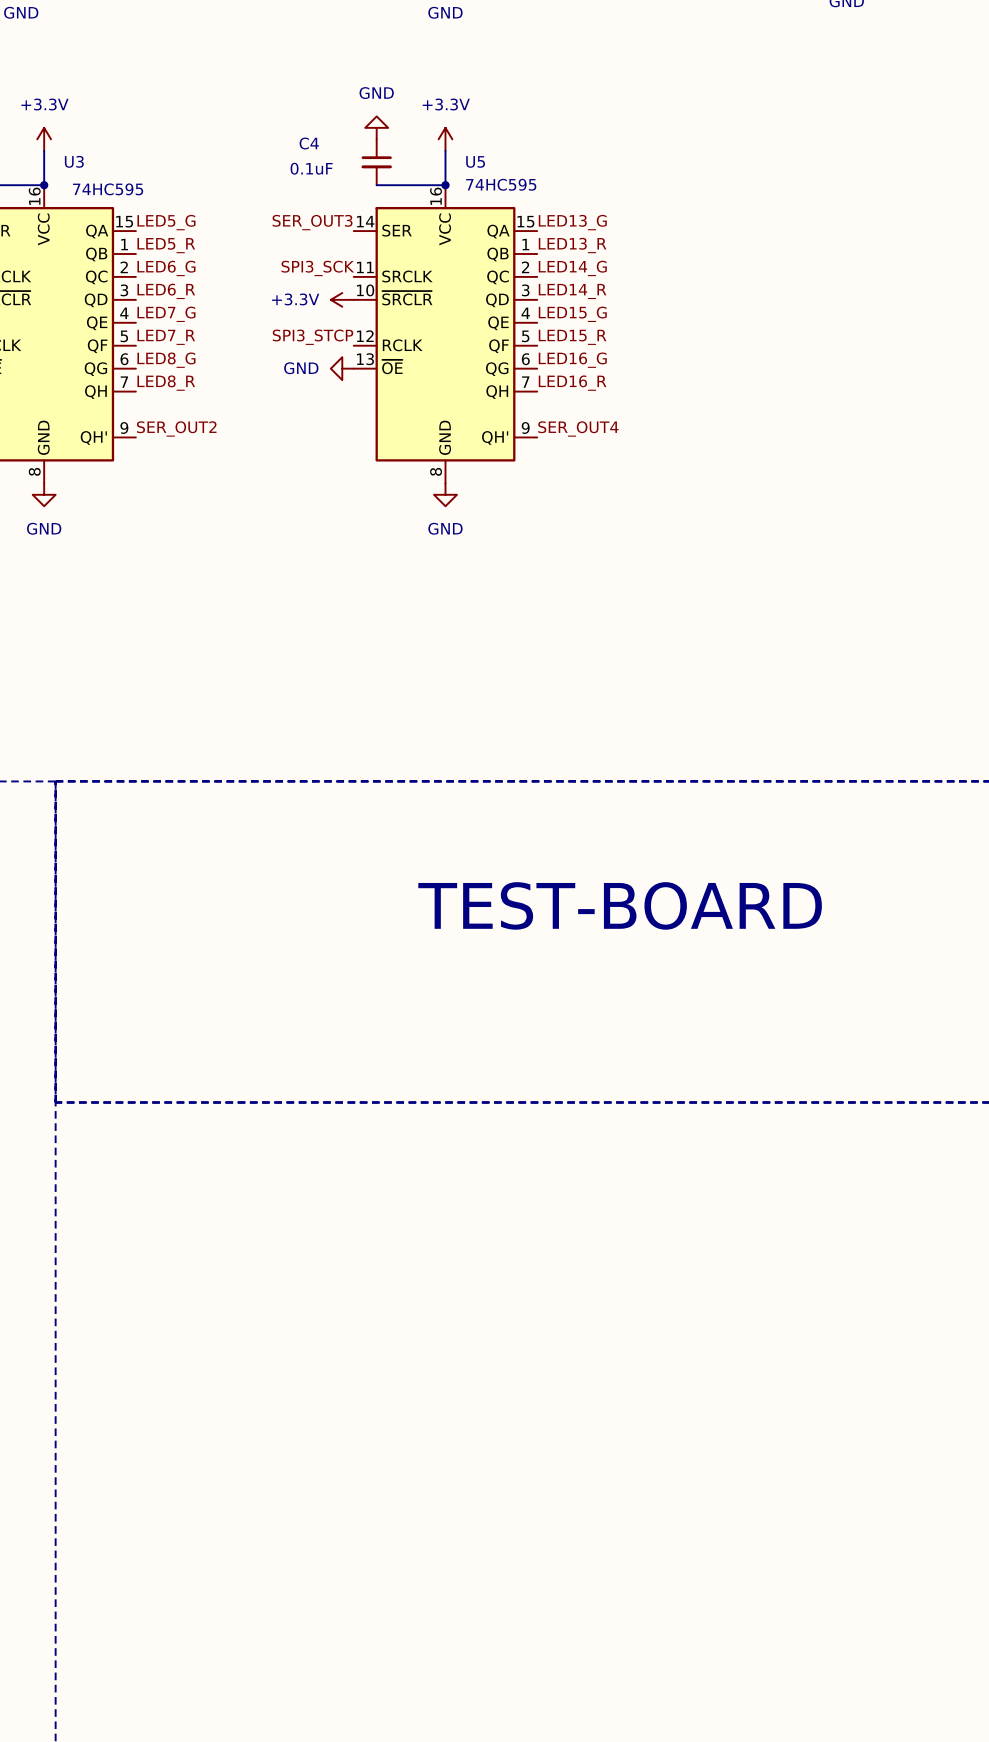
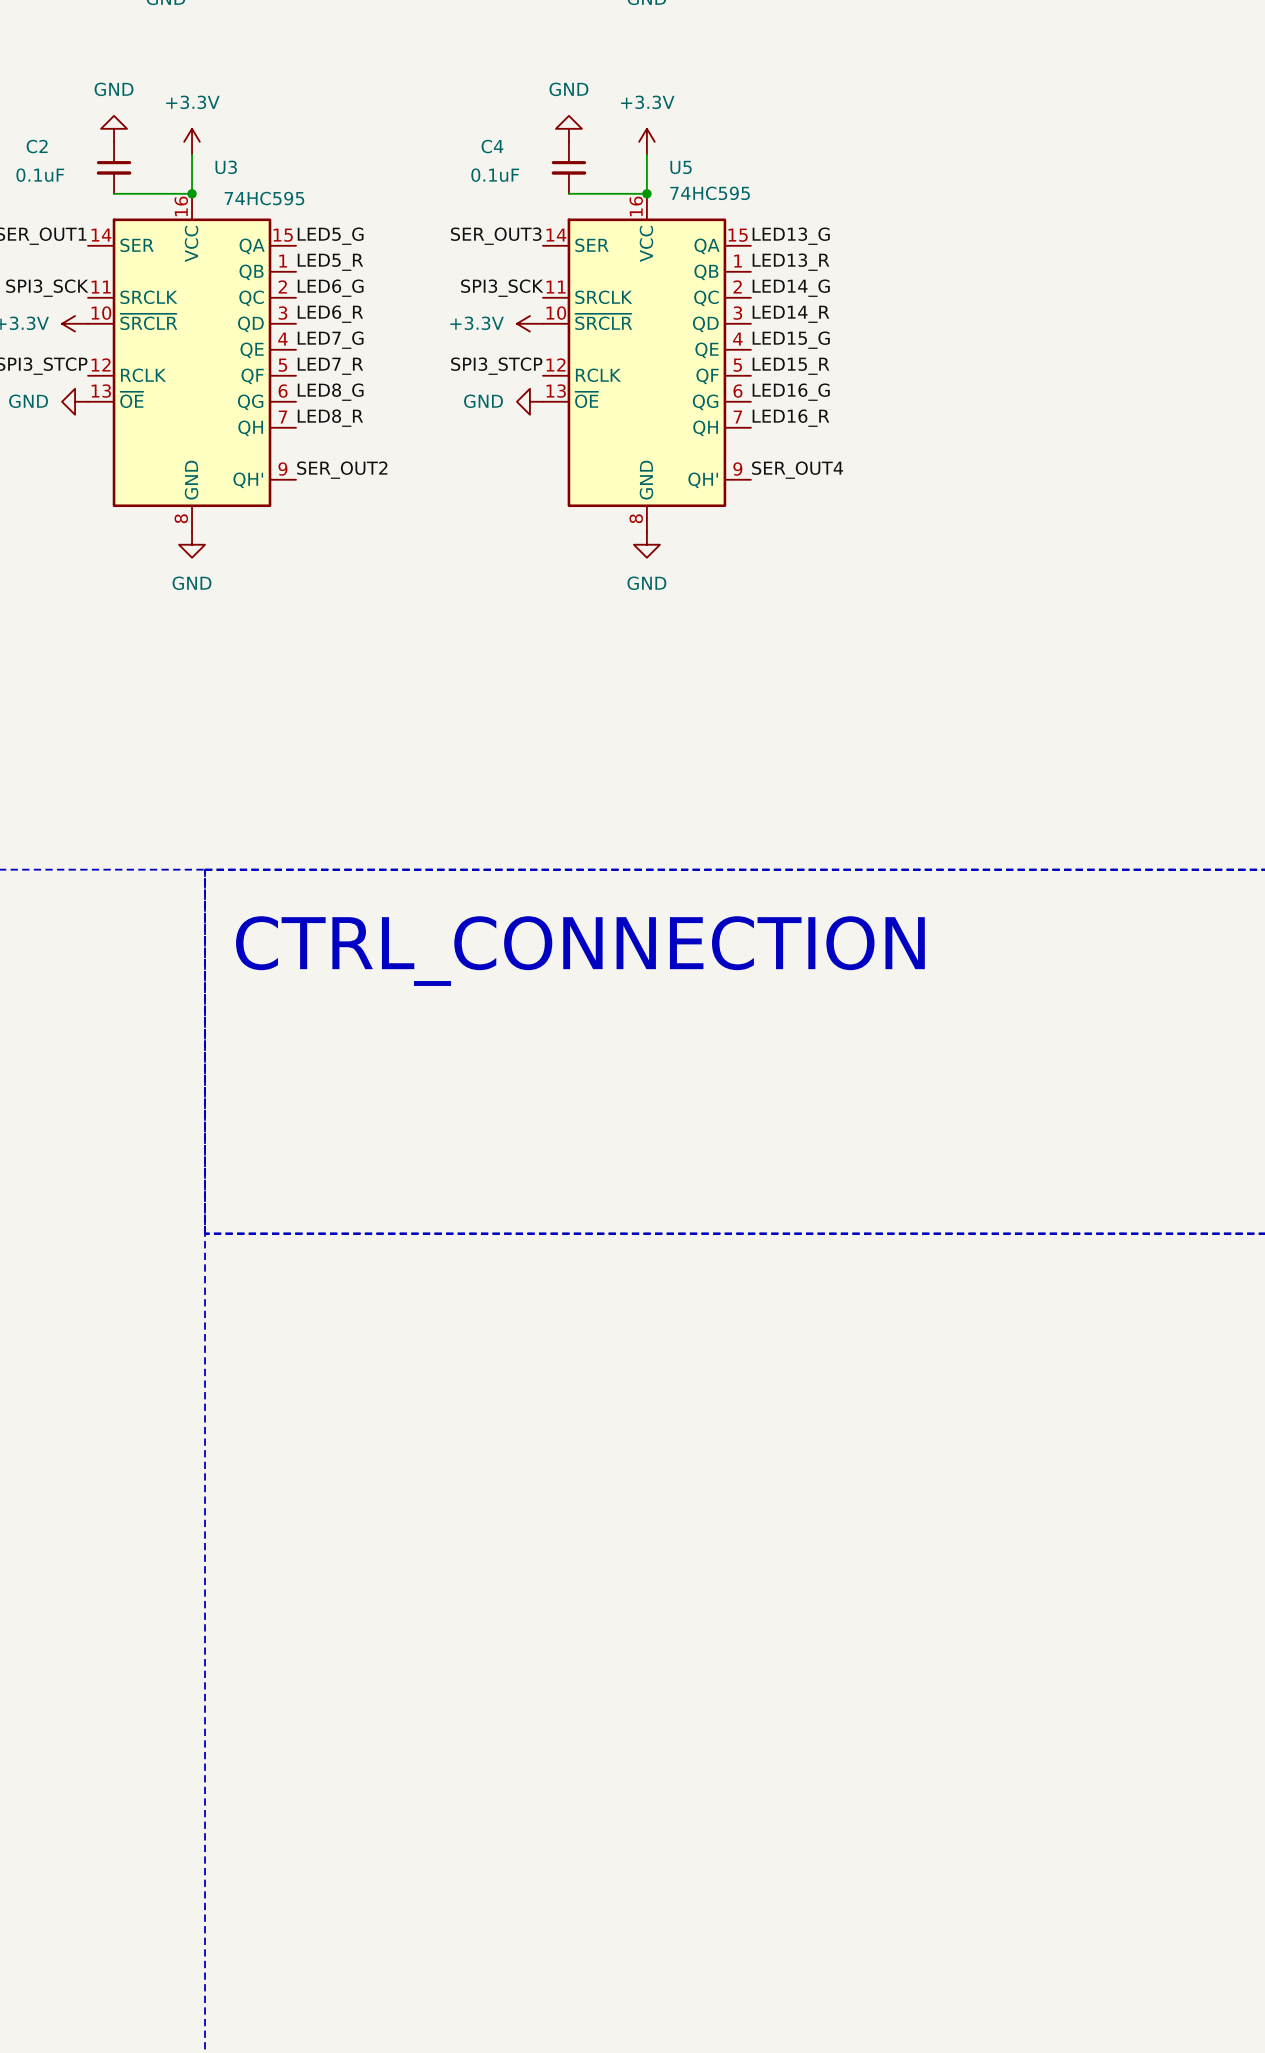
text: none -> CTRL_CONNECTION (580, 951)
text: TEST-BOARD (620, 905) -> none

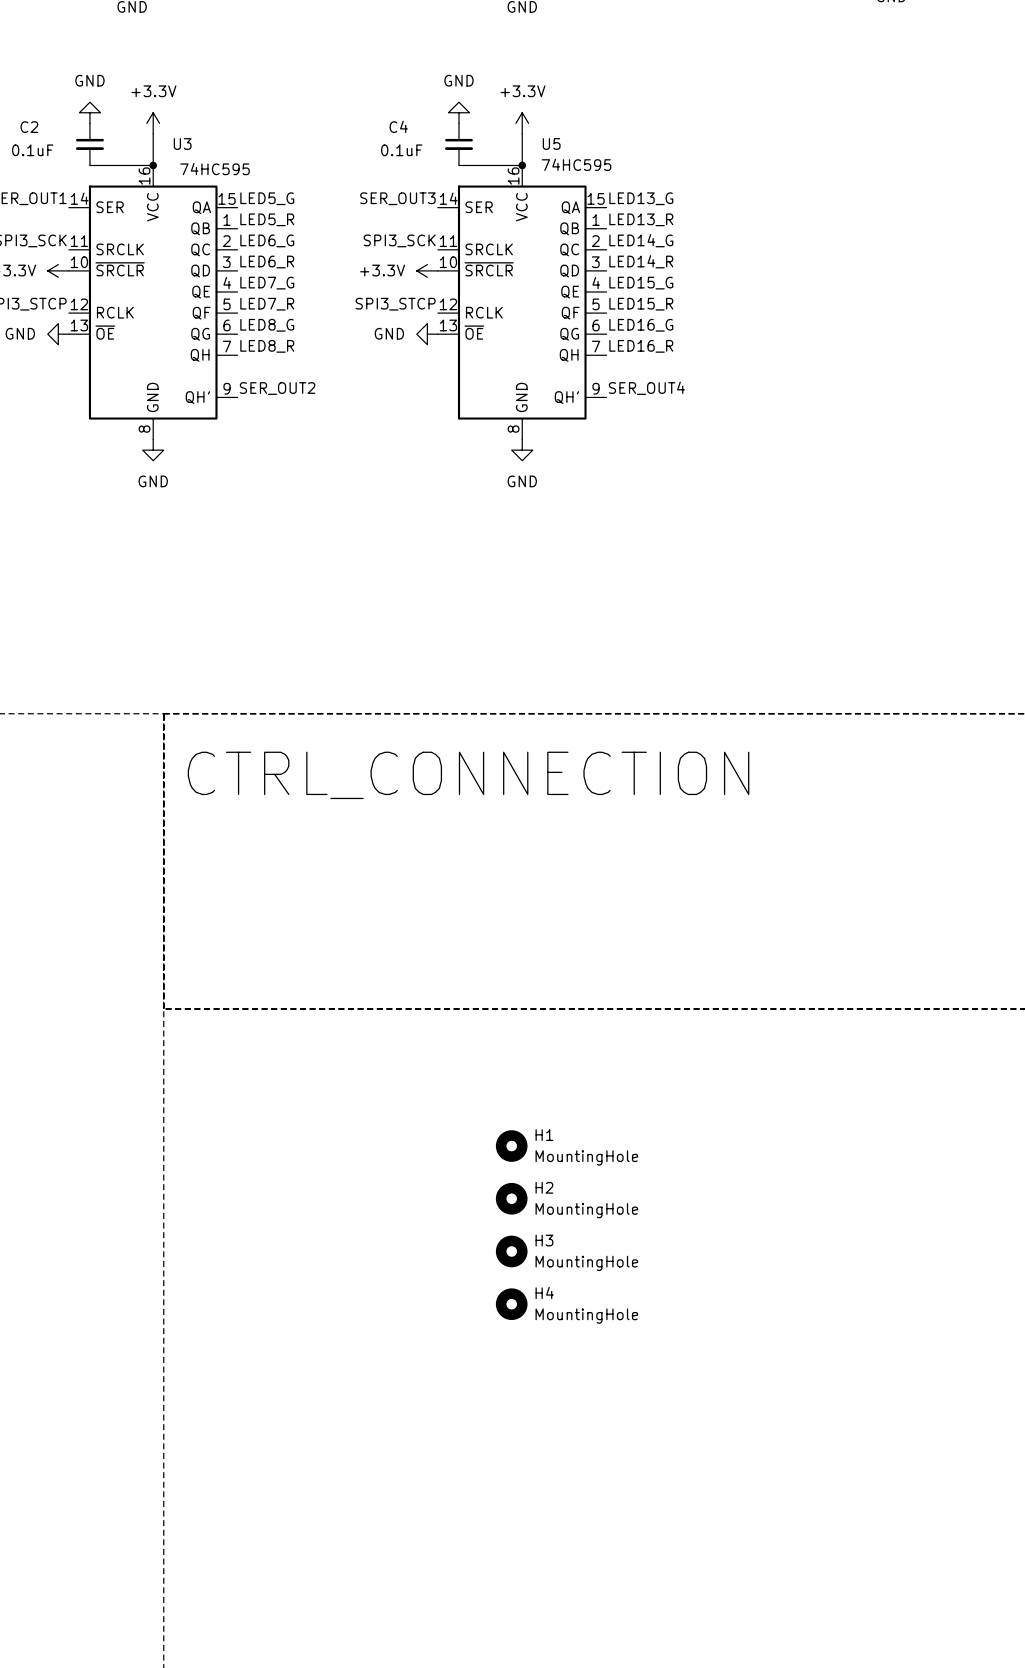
H1: none -> MountingHole (511, 1146)
H2: none -> MountingHole (511, 1198)
H3: none -> MountingHole (511, 1251)
H4: none -> MountingHole (511, 1304)

